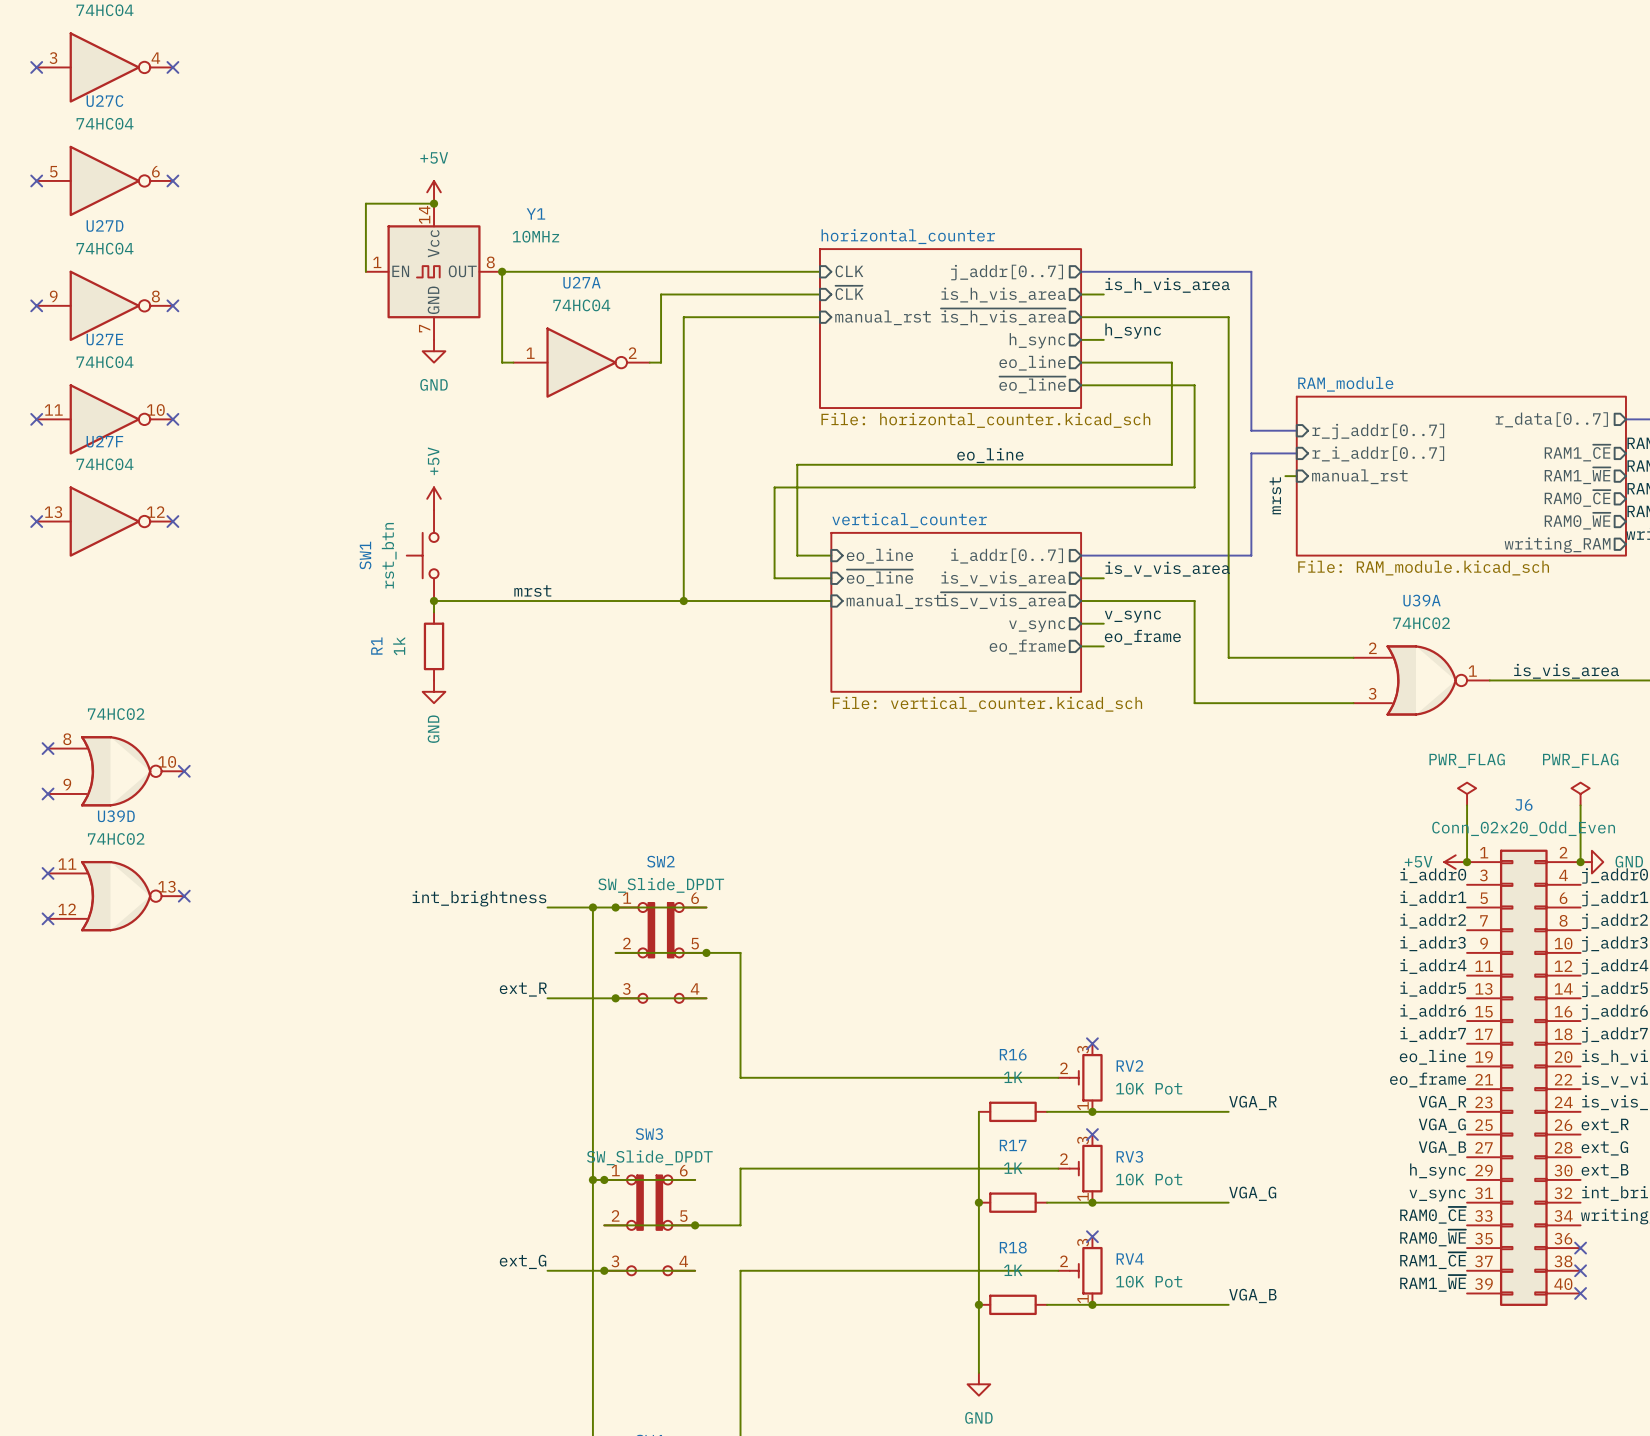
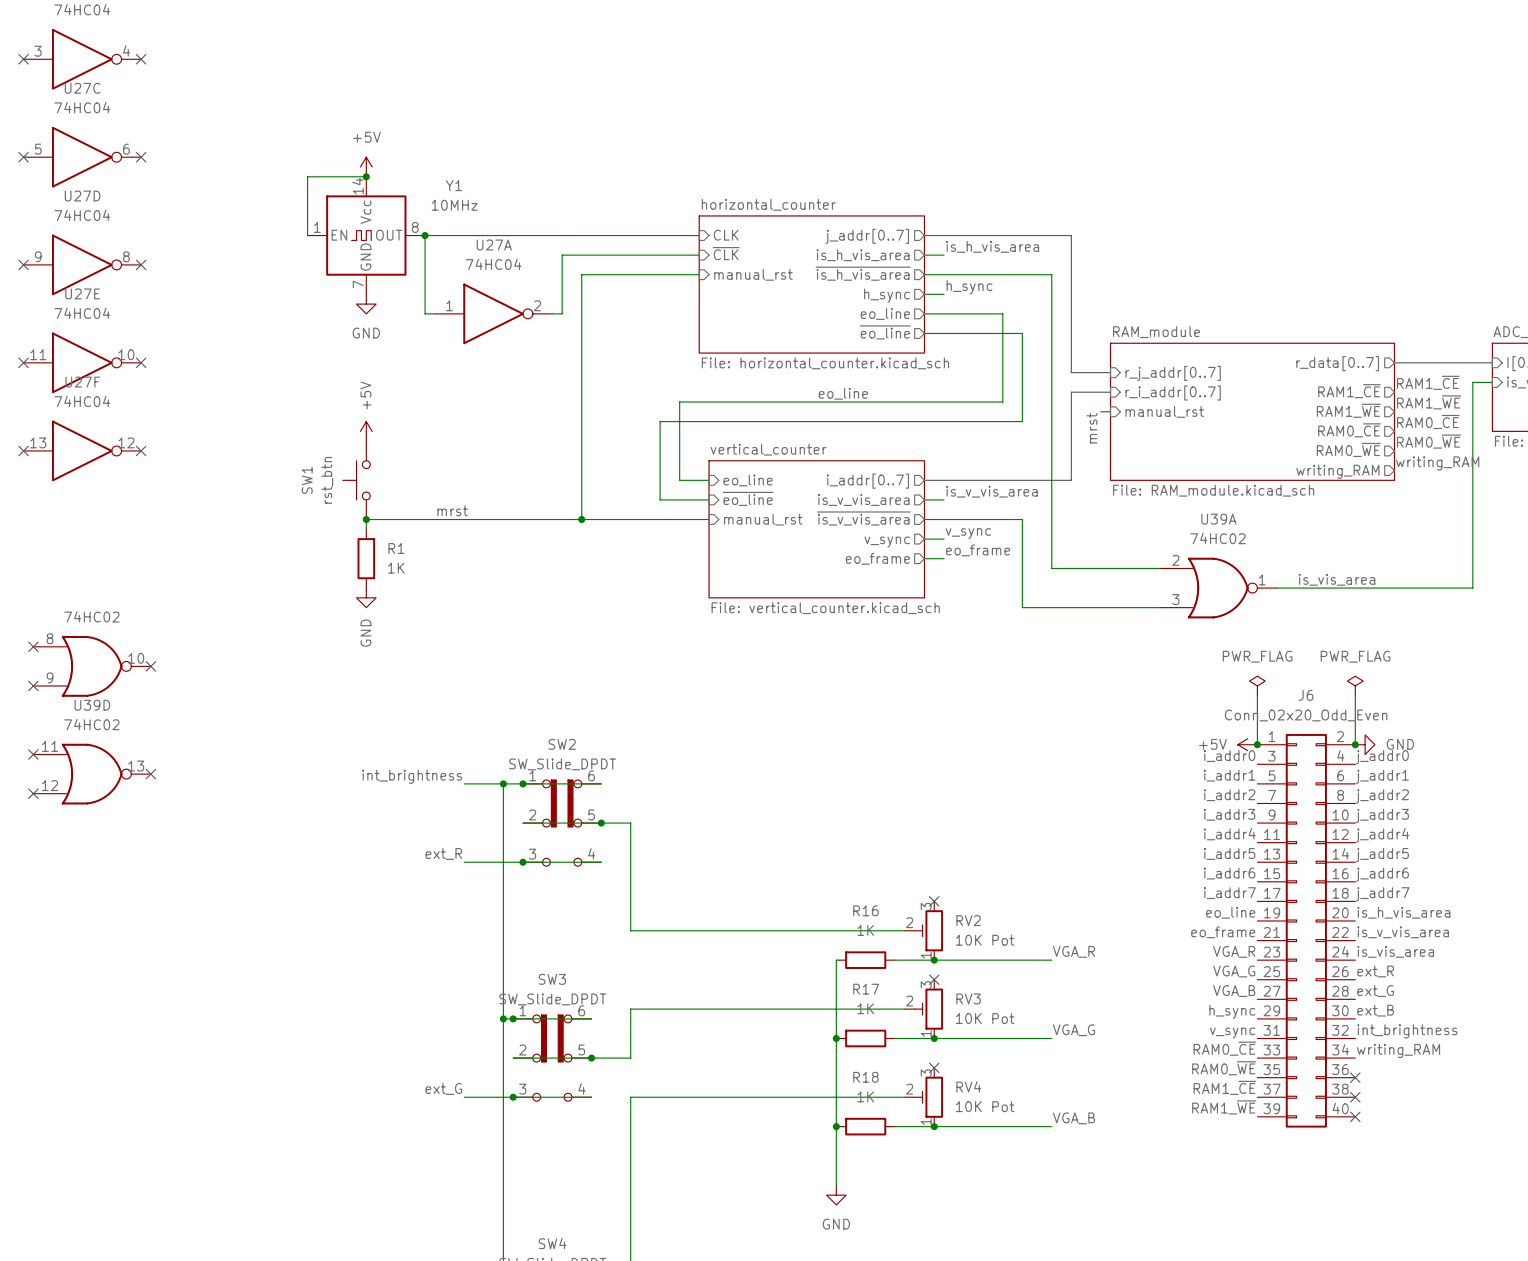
R1 name rotation: 0° (376, 646) -> 90° clockwise (396, 548)
R1 name position: R1 (376, 646) -> R1 (396, 548)
R1 value: 1k (399, 646) -> 1K (396, 568)

